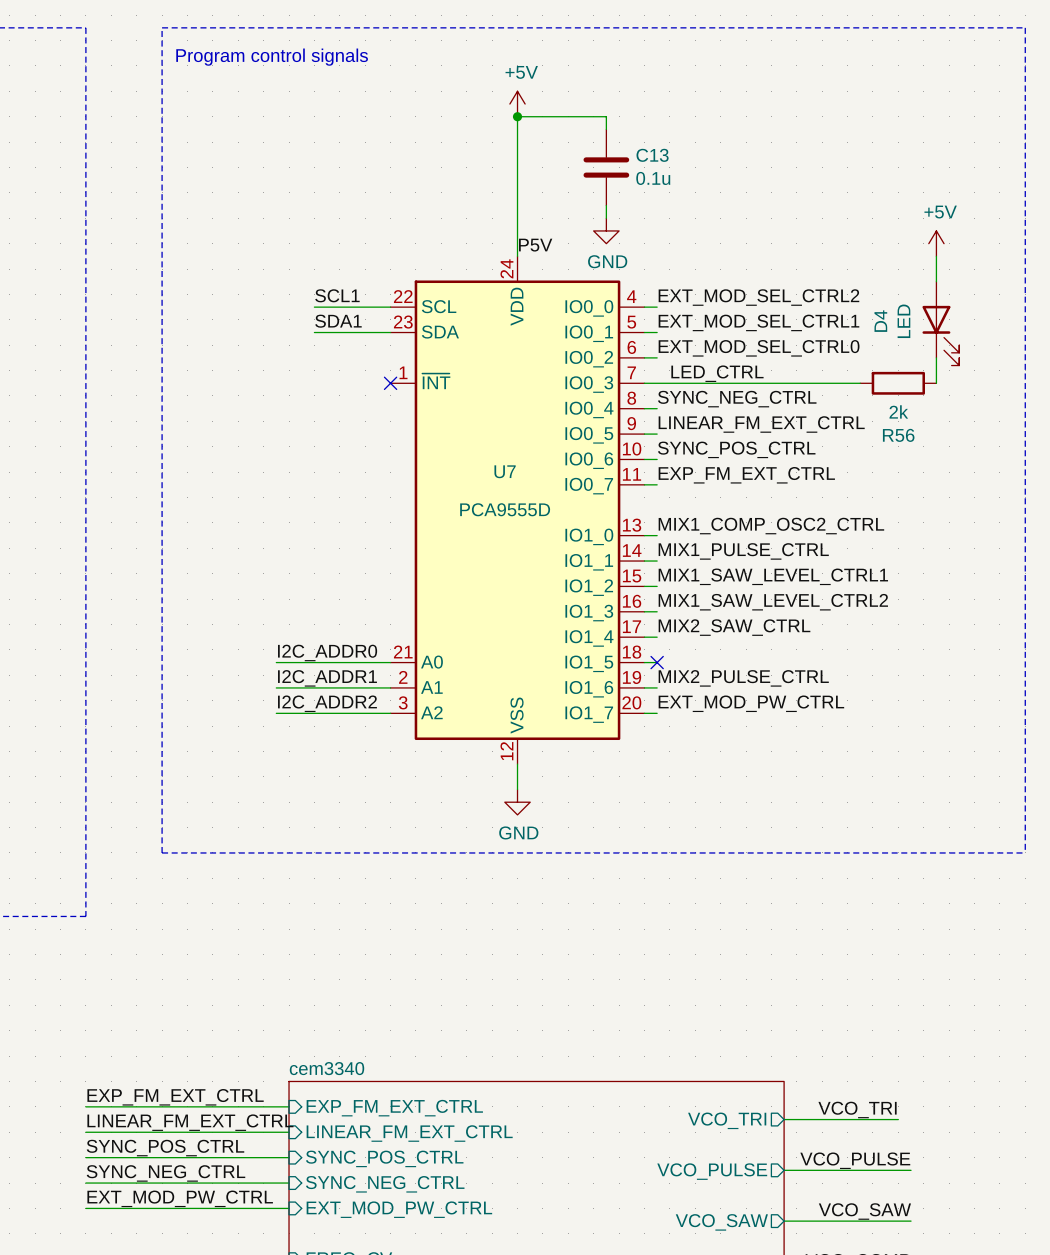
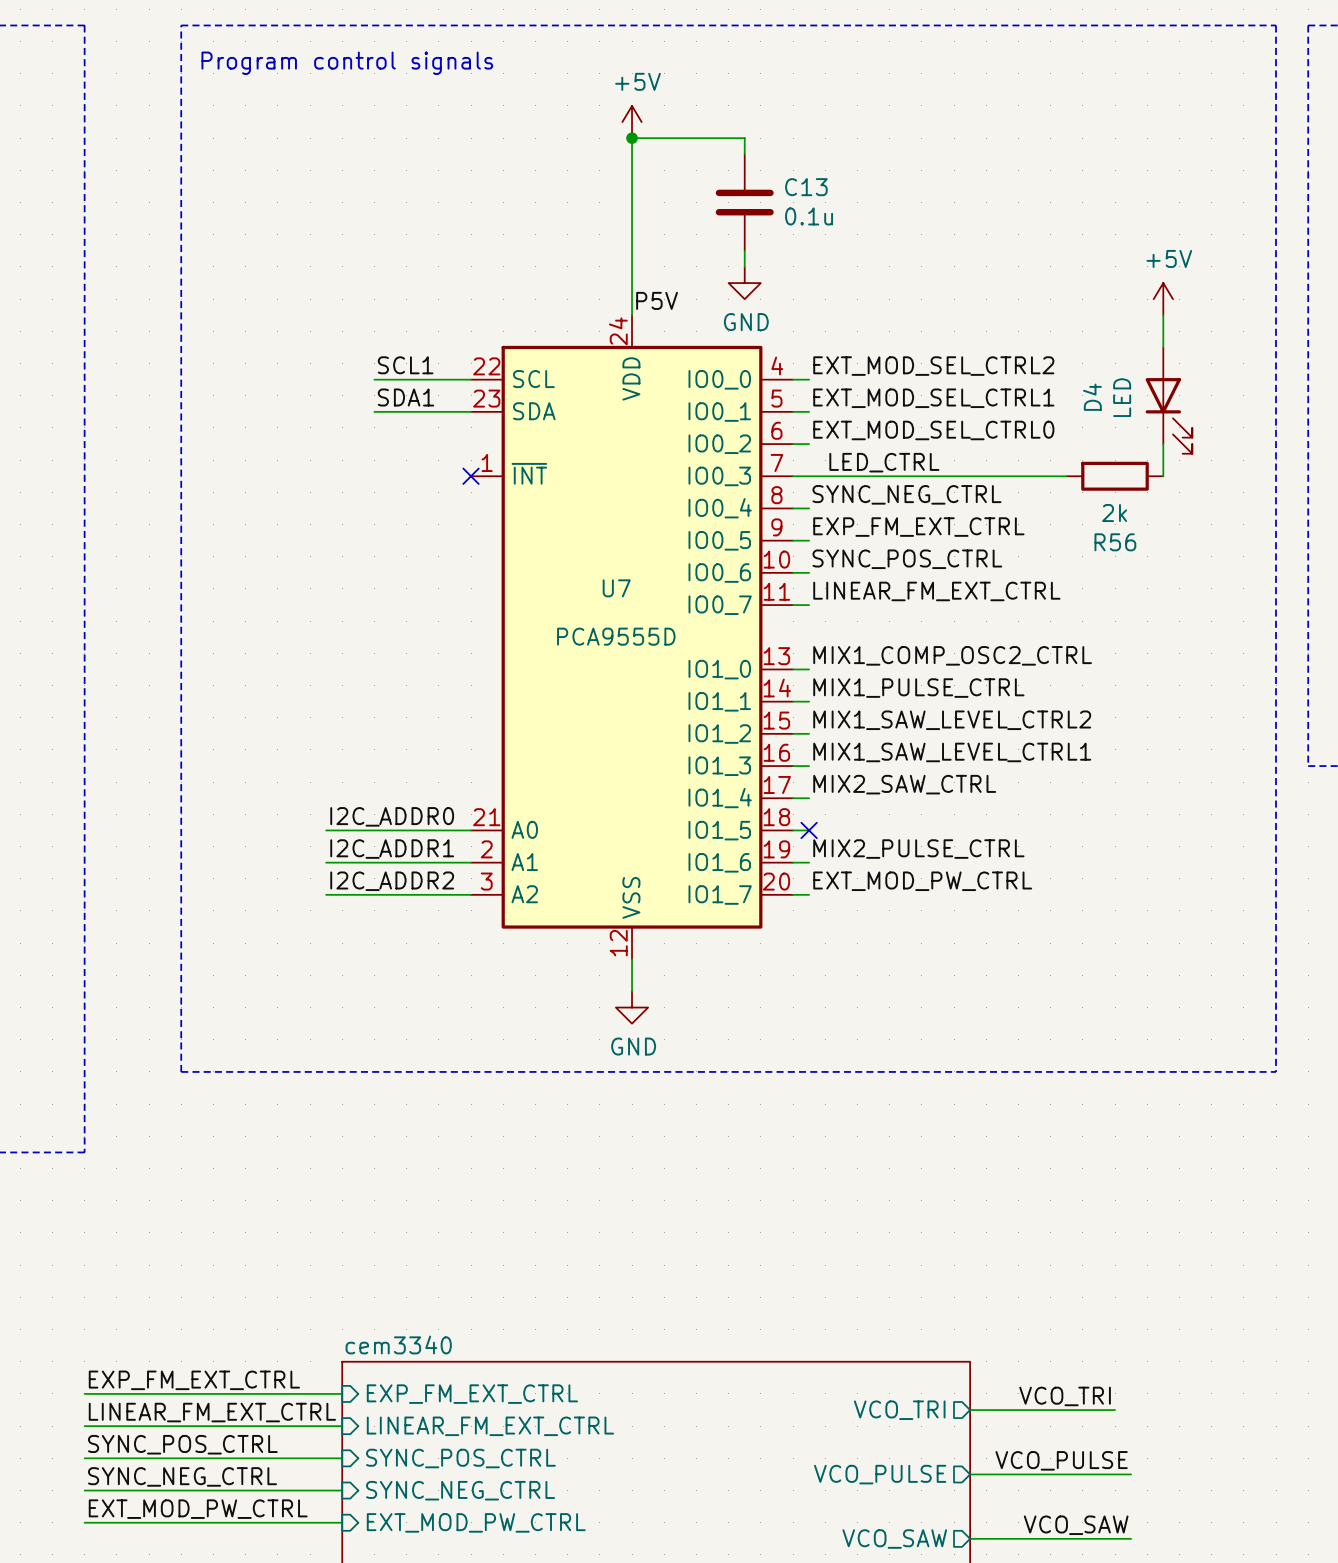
label: LINEAR_FM_EXT_CTRL (761, 424) -> EXP_FM_EXT_CTRL (918, 527)
label: EXP_FM_EXT_CTRL (746, 475) -> LINEAR_FM_EXT_CTRL (936, 591)
label: MIX1_SAW_LEVEL_CTRL1 (773, 576) -> MIX1_SAW_LEVEL_CTRL2 (952, 720)
label: MIX1_SAW_LEVEL_CTRL2 (773, 602) -> MIX1_SAW_LEVEL_CTRL1 (952, 752)

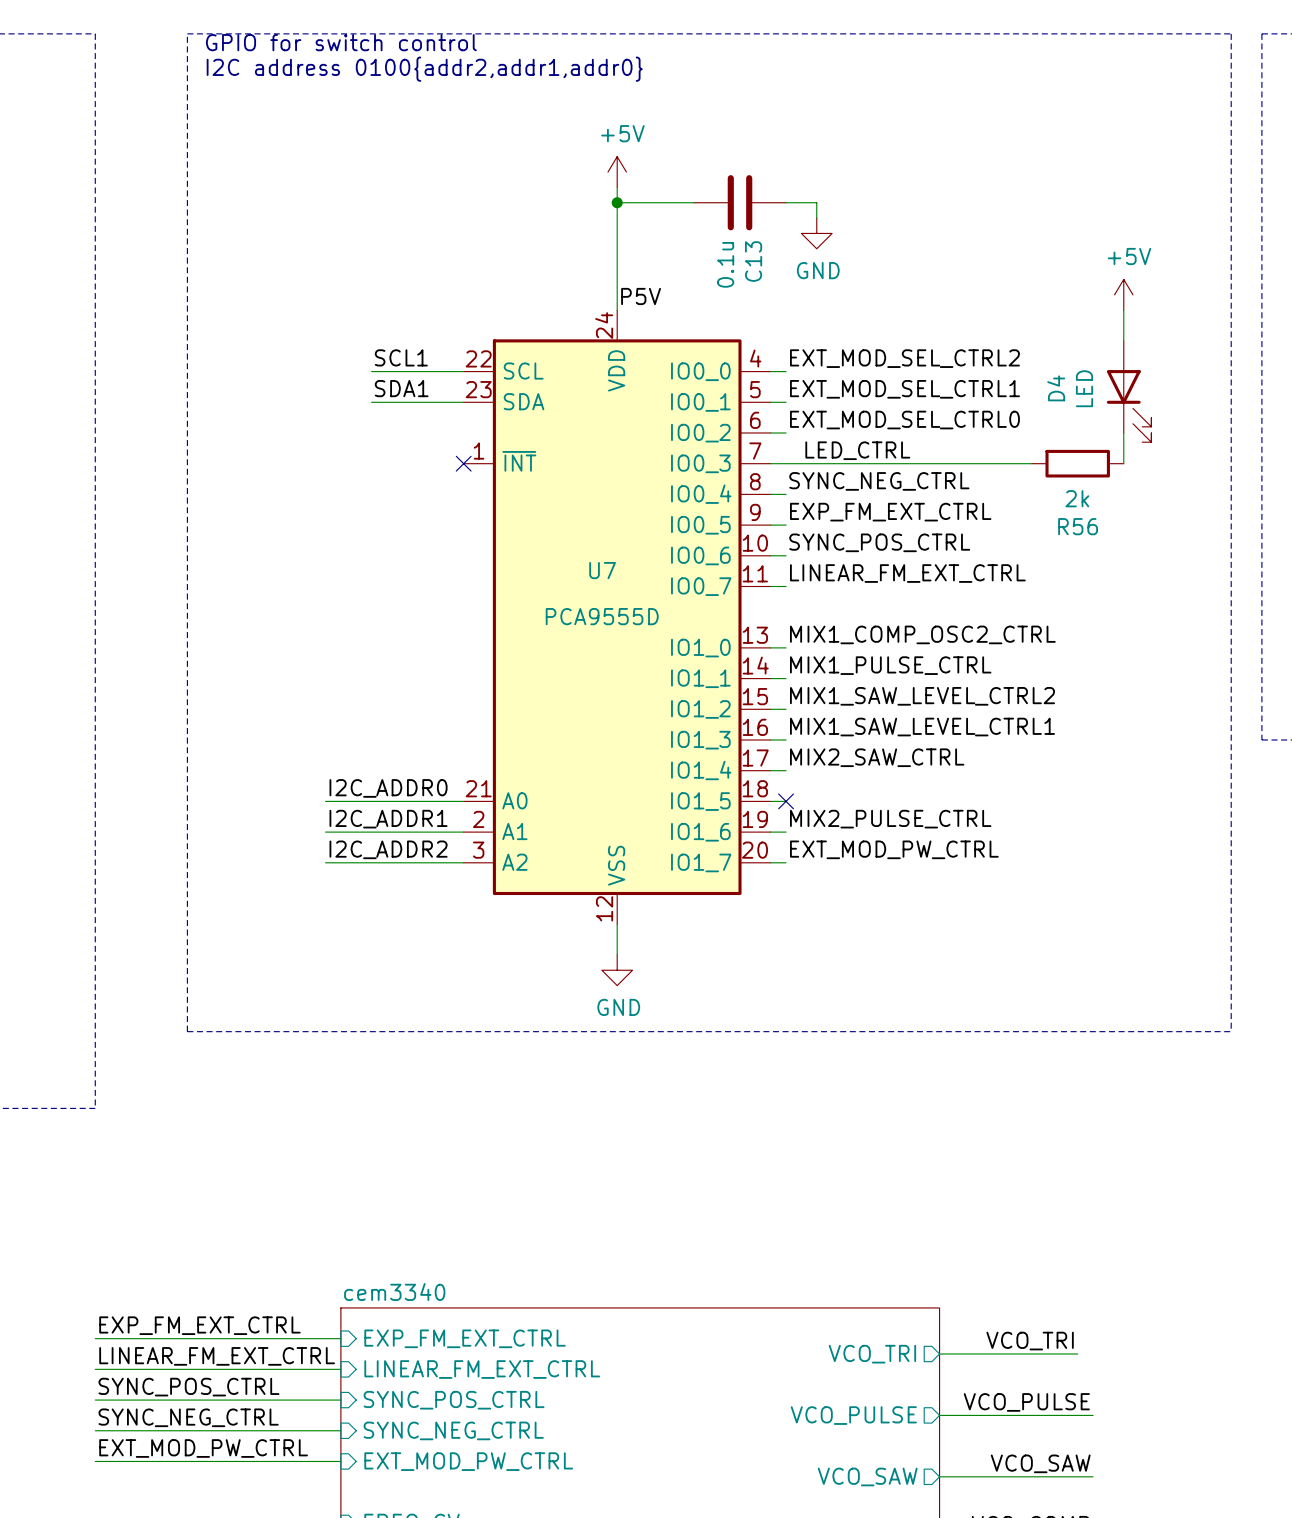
text: none -> GPIO for switch control (341, 42)
text: Program control signals (347, 63) -> I2C address 0100{addr2,addr1,addr0} (424, 69)
power symbol position: +5V (632, 122) -> +5V (617, 172)
junction position: (632, 138) -> (617, 202)
wire: (744, 154) (744, 138) (632, 138) (632, 186) -> none
wire: none -> (617, 202) (693, 202)
C13 rotation: 0° (744, 202) -> 90° clockwise (740, 202)
wire: none -> (786, 202) (816, 202) (816, 218)
wire: (744, 250) (744, 266) -> none
power symbol position: GND (744, 283) -> GND (816, 233)

